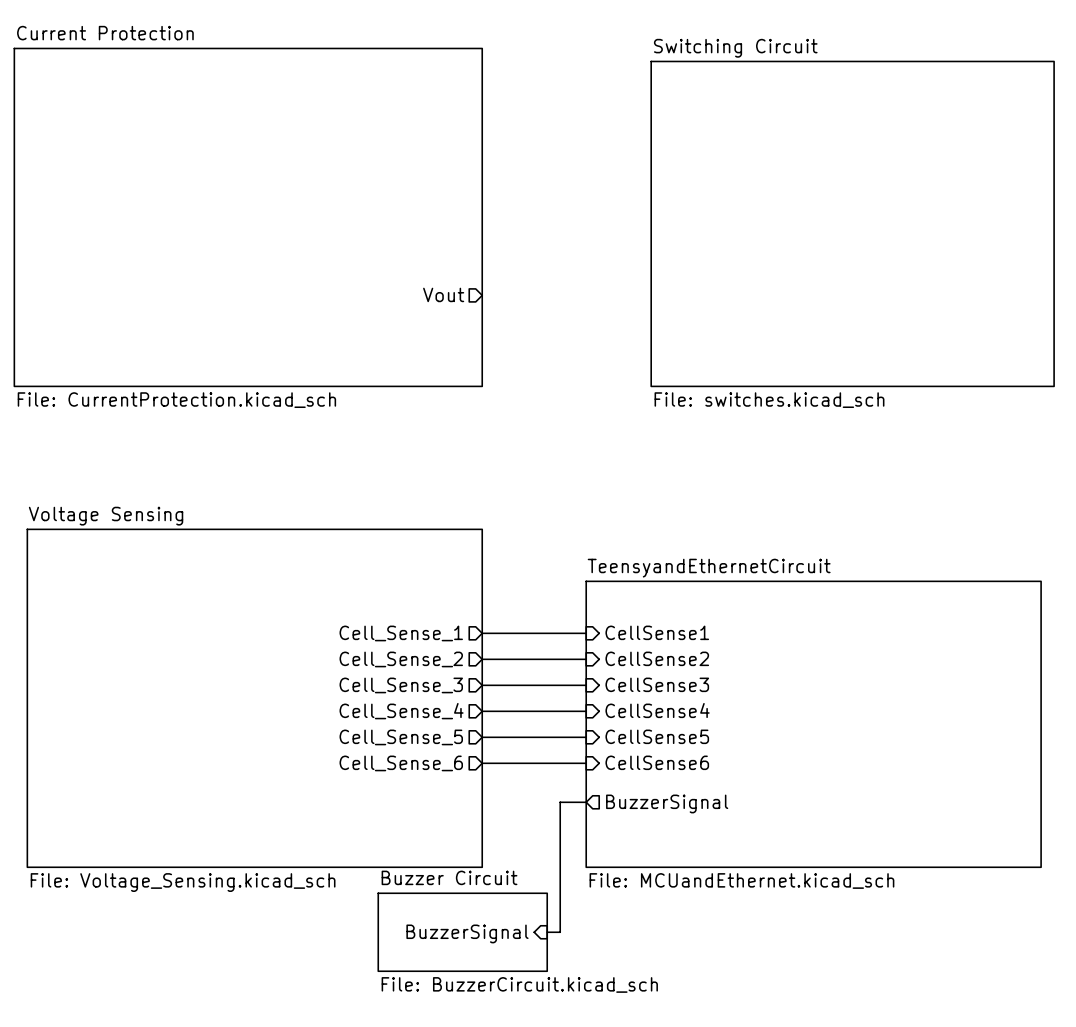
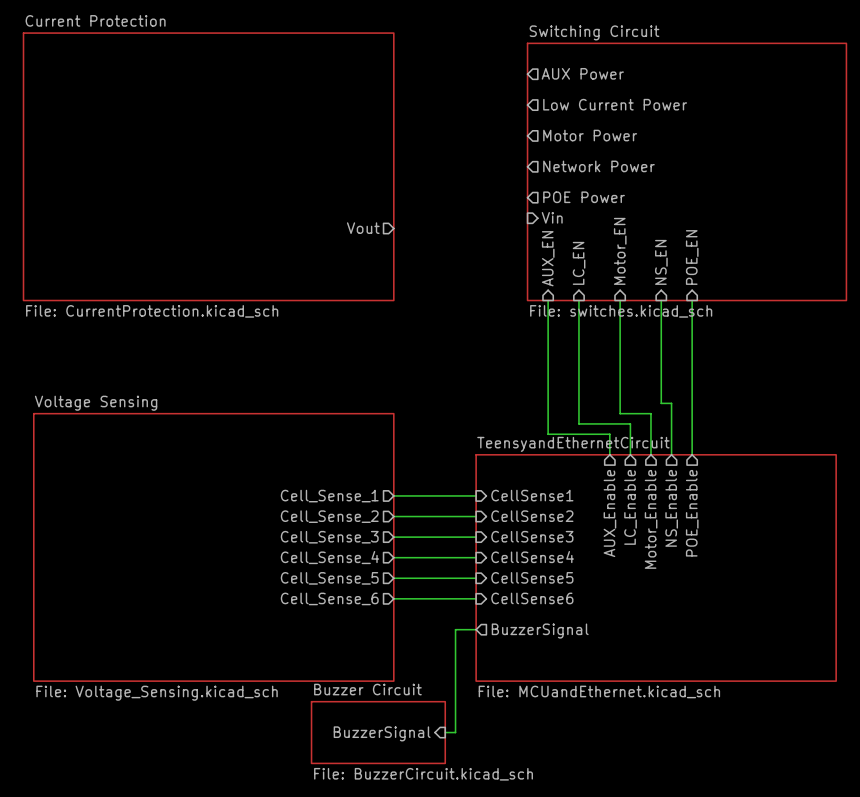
sheet pin: none -> AUX Power (582, 73)
sheet pin: none -> Low Current Power (615, 104)
sheet pin: none -> Motor Power (590, 135)
sheet pin: none -> Network Power (598, 166)
sheet pin: none -> POE Power (584, 197)
sheet pin: none -> Vin (552, 217)
sheet pin: none -> Motor_EN (620, 251)
sheet pin: none -> POE_EN (692, 257)
sheet pin: none -> AUX_EN (548, 258)
sheet pin: none -> NS_EN (661, 262)
sheet pin: none -> LC_EN (579, 263)
wire: none -> (548, 300) (548, 434) (609, 434) (609, 454)
wire: none -> (578, 300) (578, 423) (630, 423) (630, 454)
wire: none -> (620, 300) (620, 413) (650, 413) (650, 454)
wire: none -> (661, 300) (661, 403) (671, 403) (671, 454)
wire: none -> (692, 300) (692, 454)
sheet pin: none -> LC_Enable (630, 507)
sheet pin: none -> NS_Enable (671, 508)
sheet pin: none -> AUX_Enable (609, 513)
sheet pin: none -> POE_Enable (692, 513)
sheet pin: none -> Motor_Enable (651, 519)

